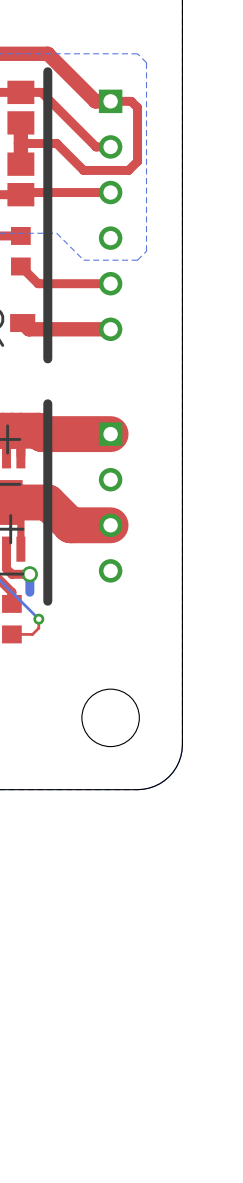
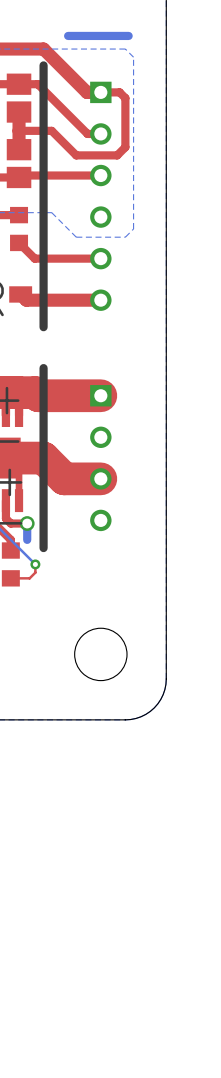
bottom track: none -> (128, 35) (68, 35)

